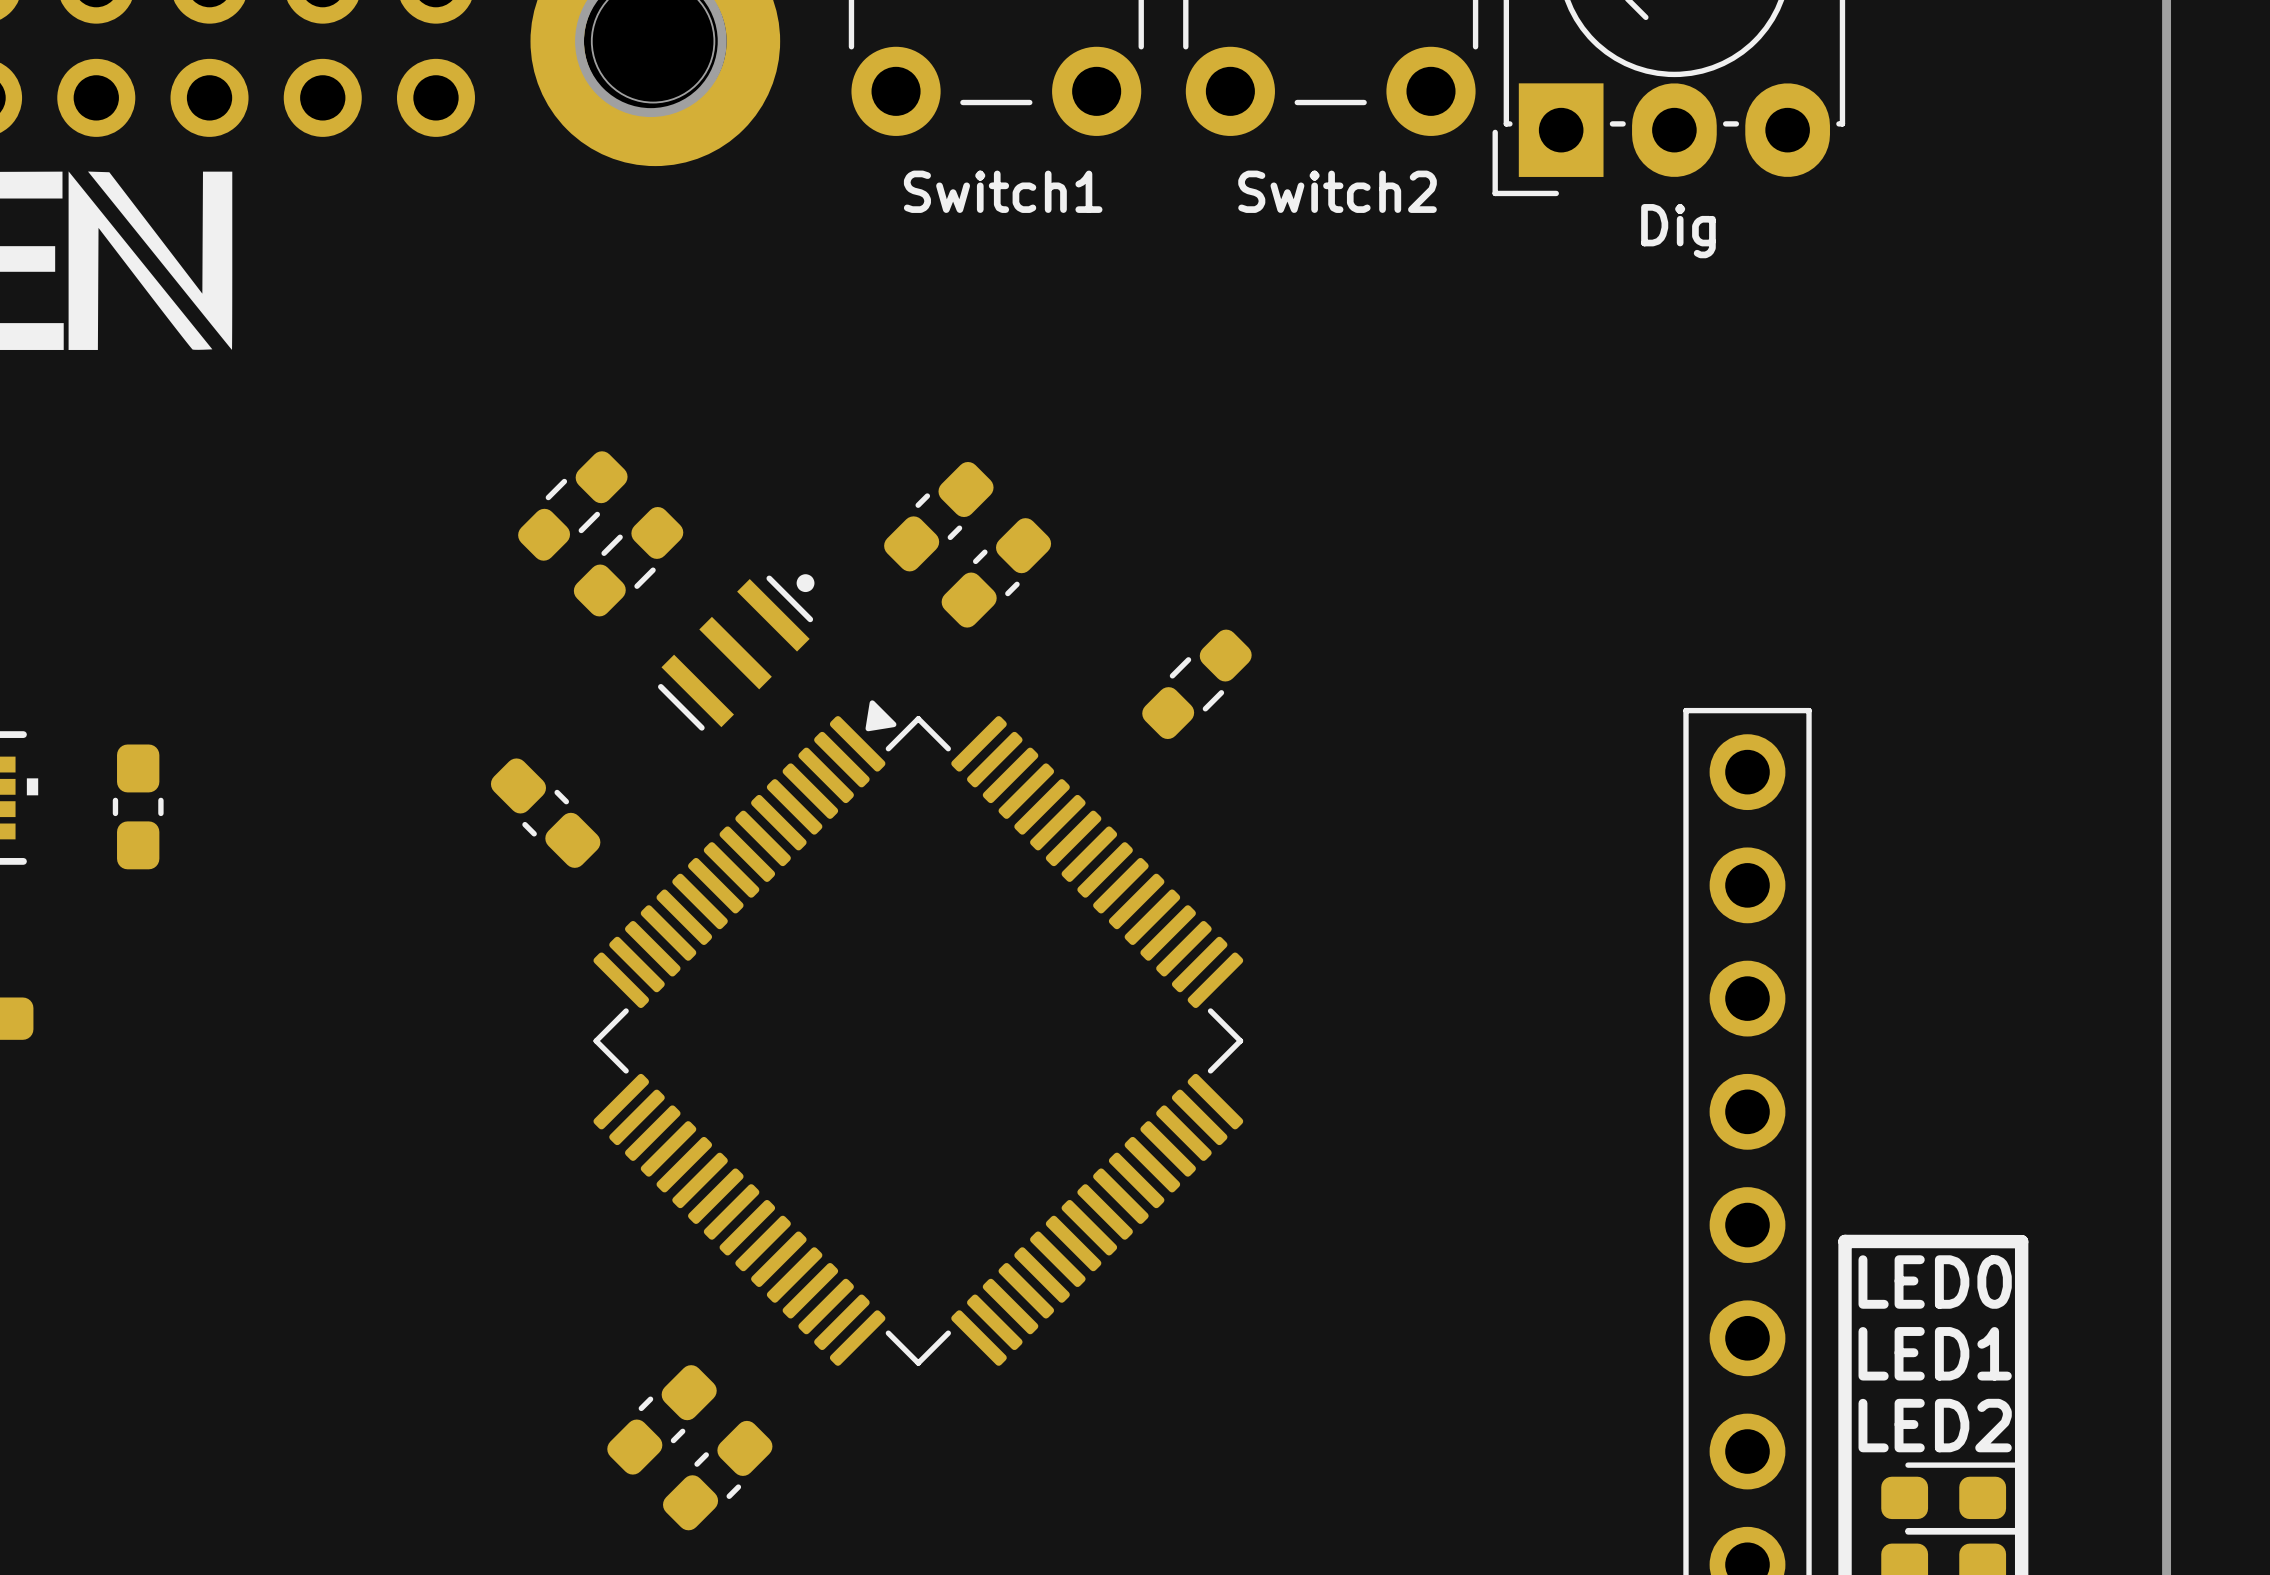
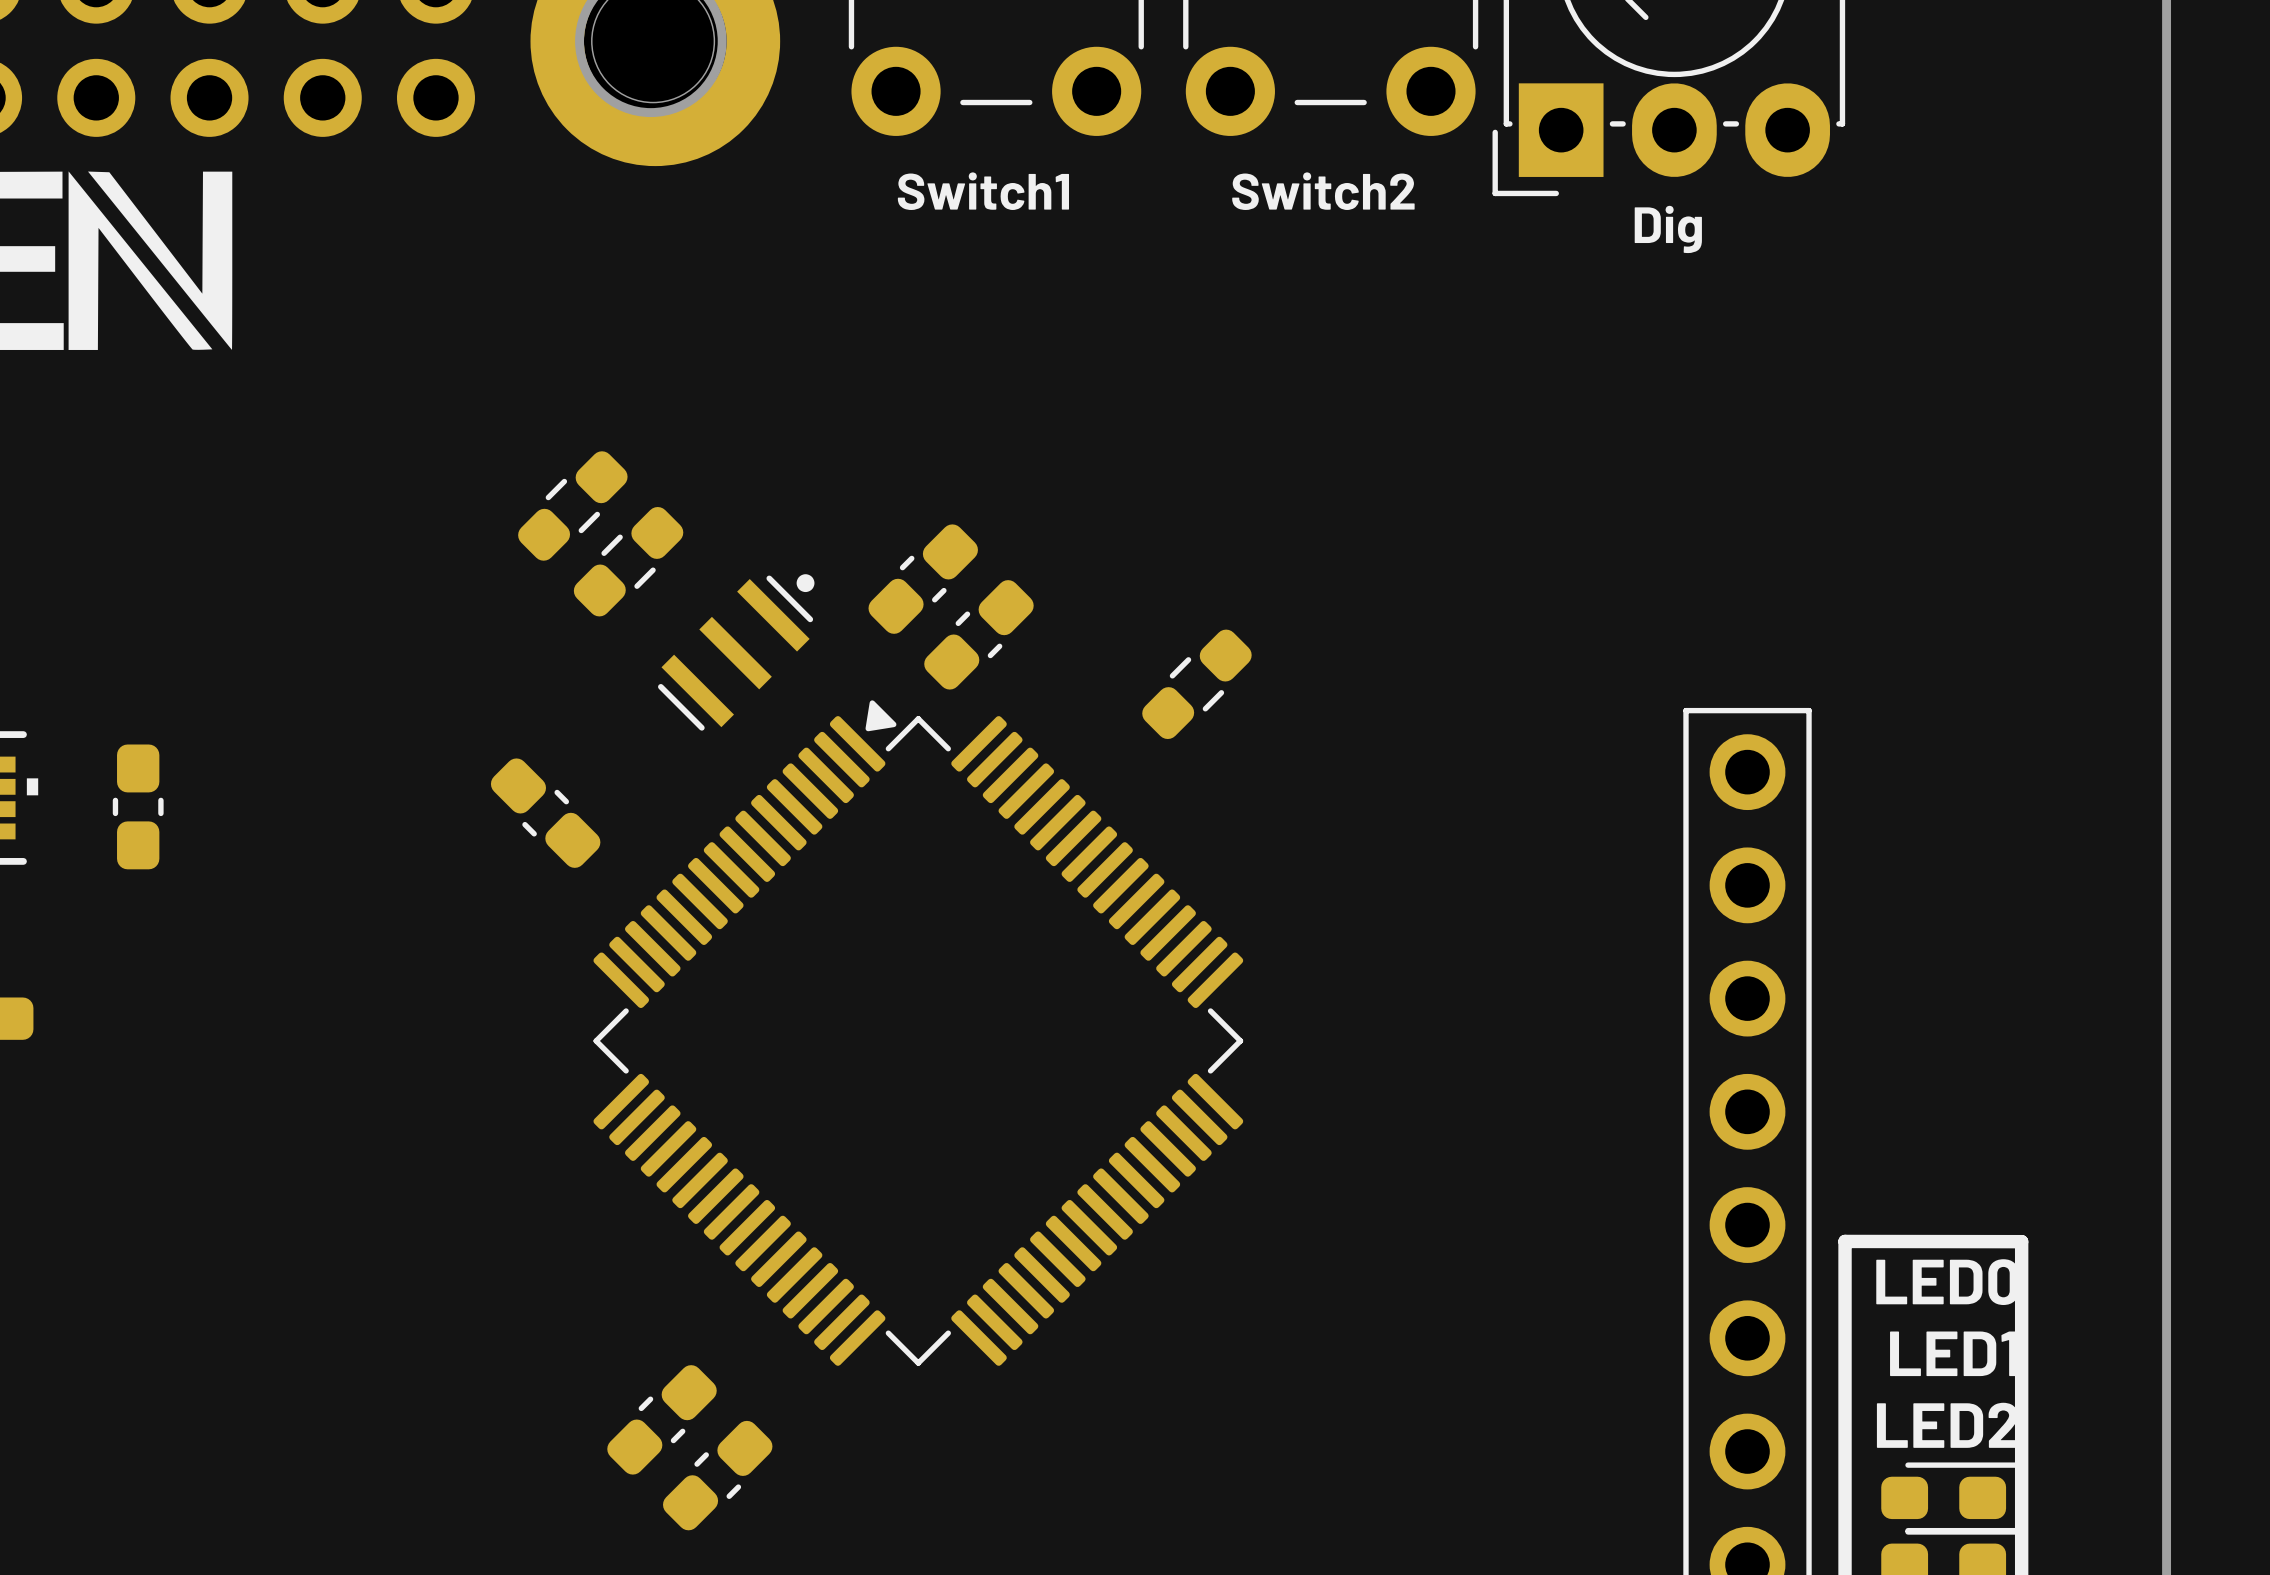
part: (938, 516) -> none
part: (996, 572) -> none
part: none -> (923, 579)
part: none -> (978, 634)

